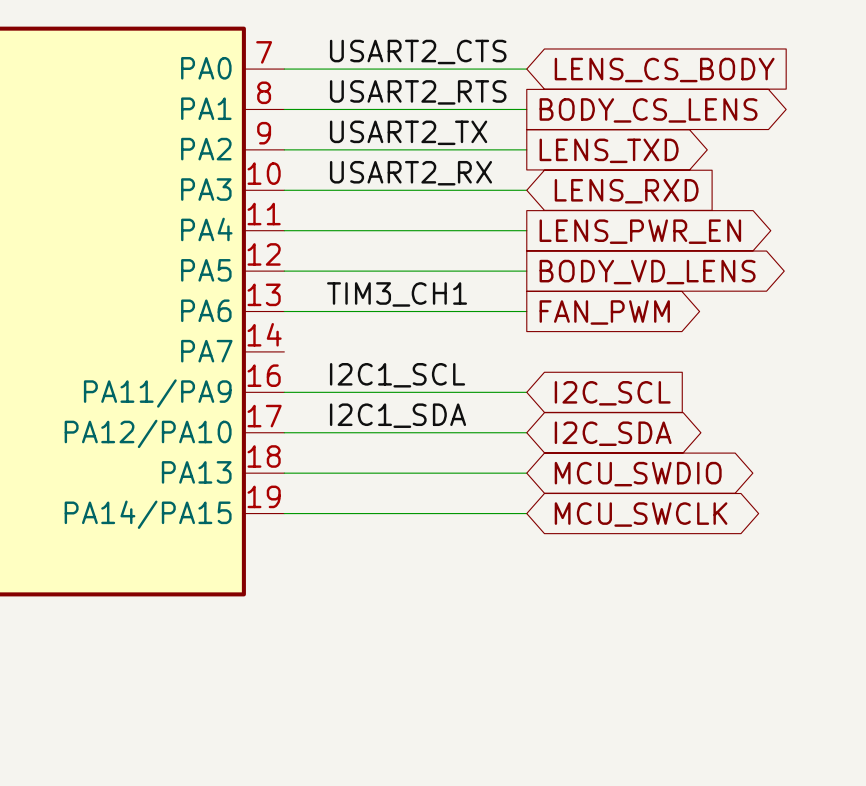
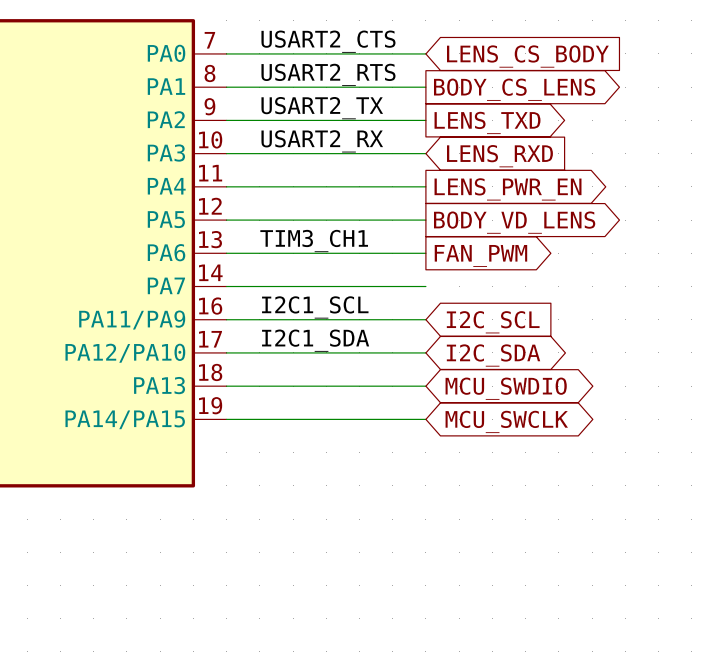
wire: none -> (226, 286) (425, 286)

